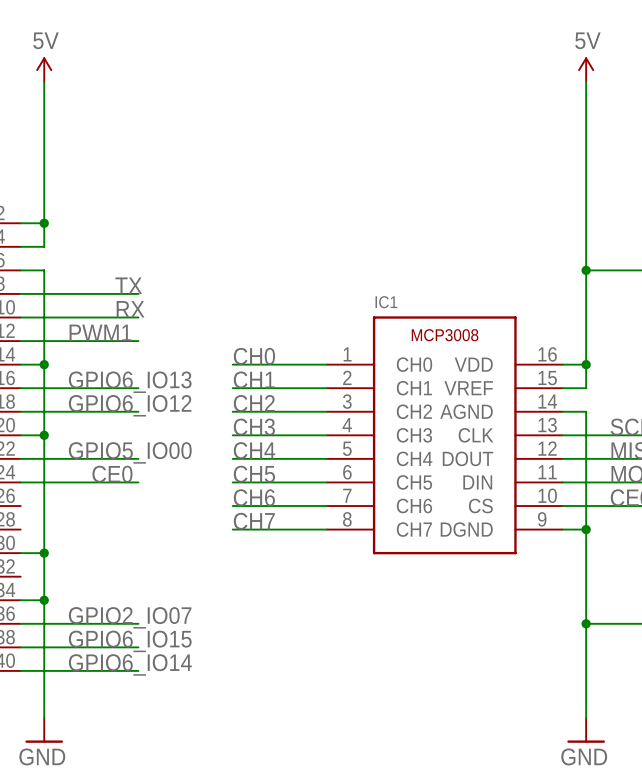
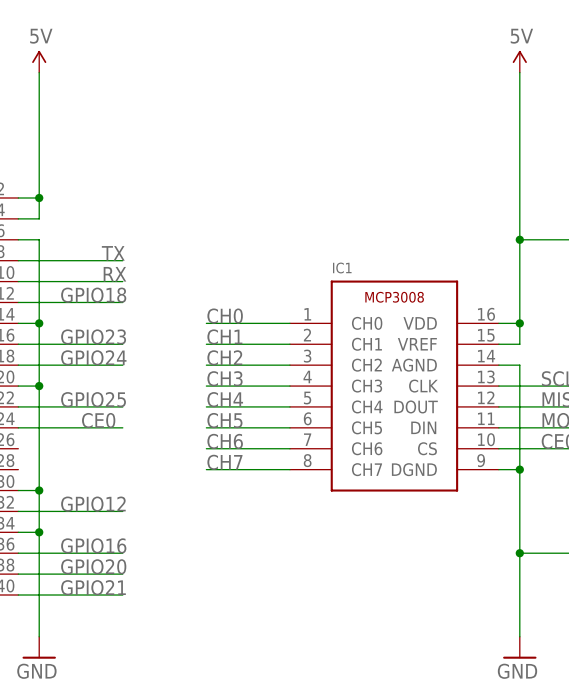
label: PWM1 (100, 332) -> GPIO18 (93, 295)
label: GPIO6_IO13 (130, 382) -> GPIO23 (93, 336)
label: GPIO6_IO12 (130, 405) -> GPIO24 (93, 357)
label: GPIO5_IO00 (130, 452) -> GPIO25 (93, 399)
label: none -> GPIO12 (93, 504)
wire: none -> (18, 511) (122, 511)
label: GPIO2_IO07 (130, 617) -> GPIO16 (93, 545)
label: GPIO6_IO15 (130, 641) -> GPIO20 (93, 566)
label: GPIO6_IO14 (130, 664) -> GPIO21 (93, 587)

